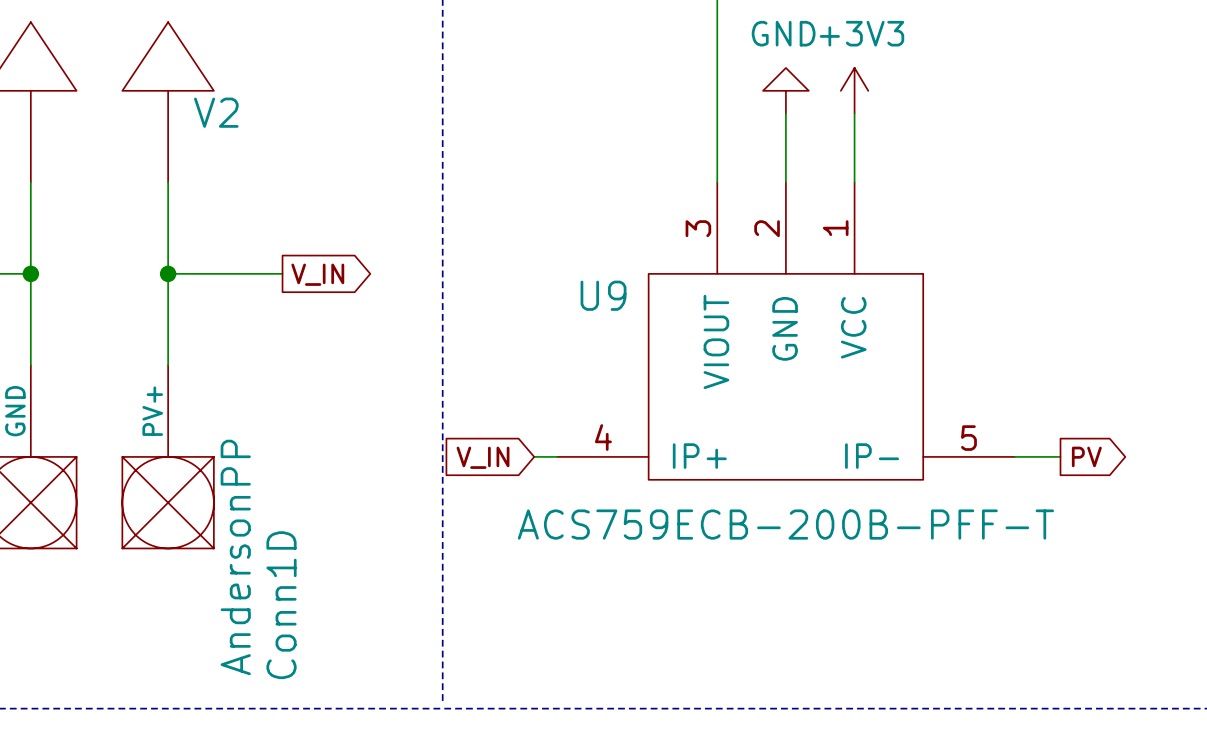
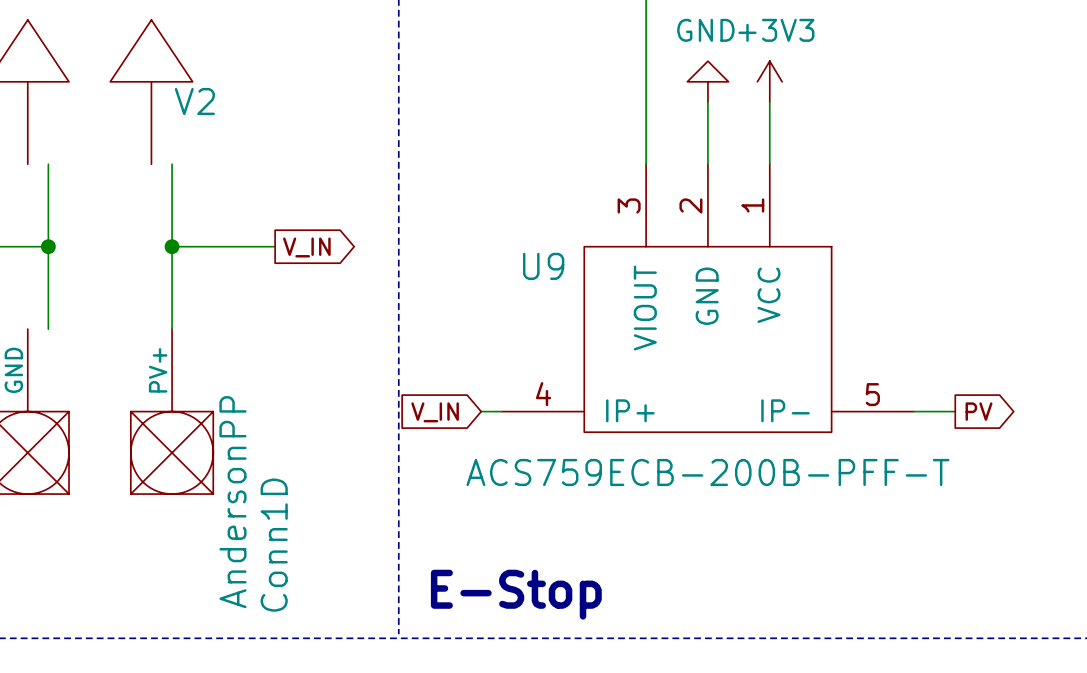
wire: (30, 182) (30, 365) -> (48, 164) (48, 329)
wire: (168, 182) (168, 365) -> (172, 164) (172, 329)
wire: none -> (27, 246) (48, 246)
junction position: (30, 273) -> (48, 246)
wire: (168, 273) (191, 273) -> (254, 246) (275, 246)
junction position: (168, 273) -> (172, 246)
global label position: V_IN (317, 274) -> V_IN (306, 247)
Conn1D position: (168, 456) -> (172, 411)
text: none -> E-Stop (516, 594)

